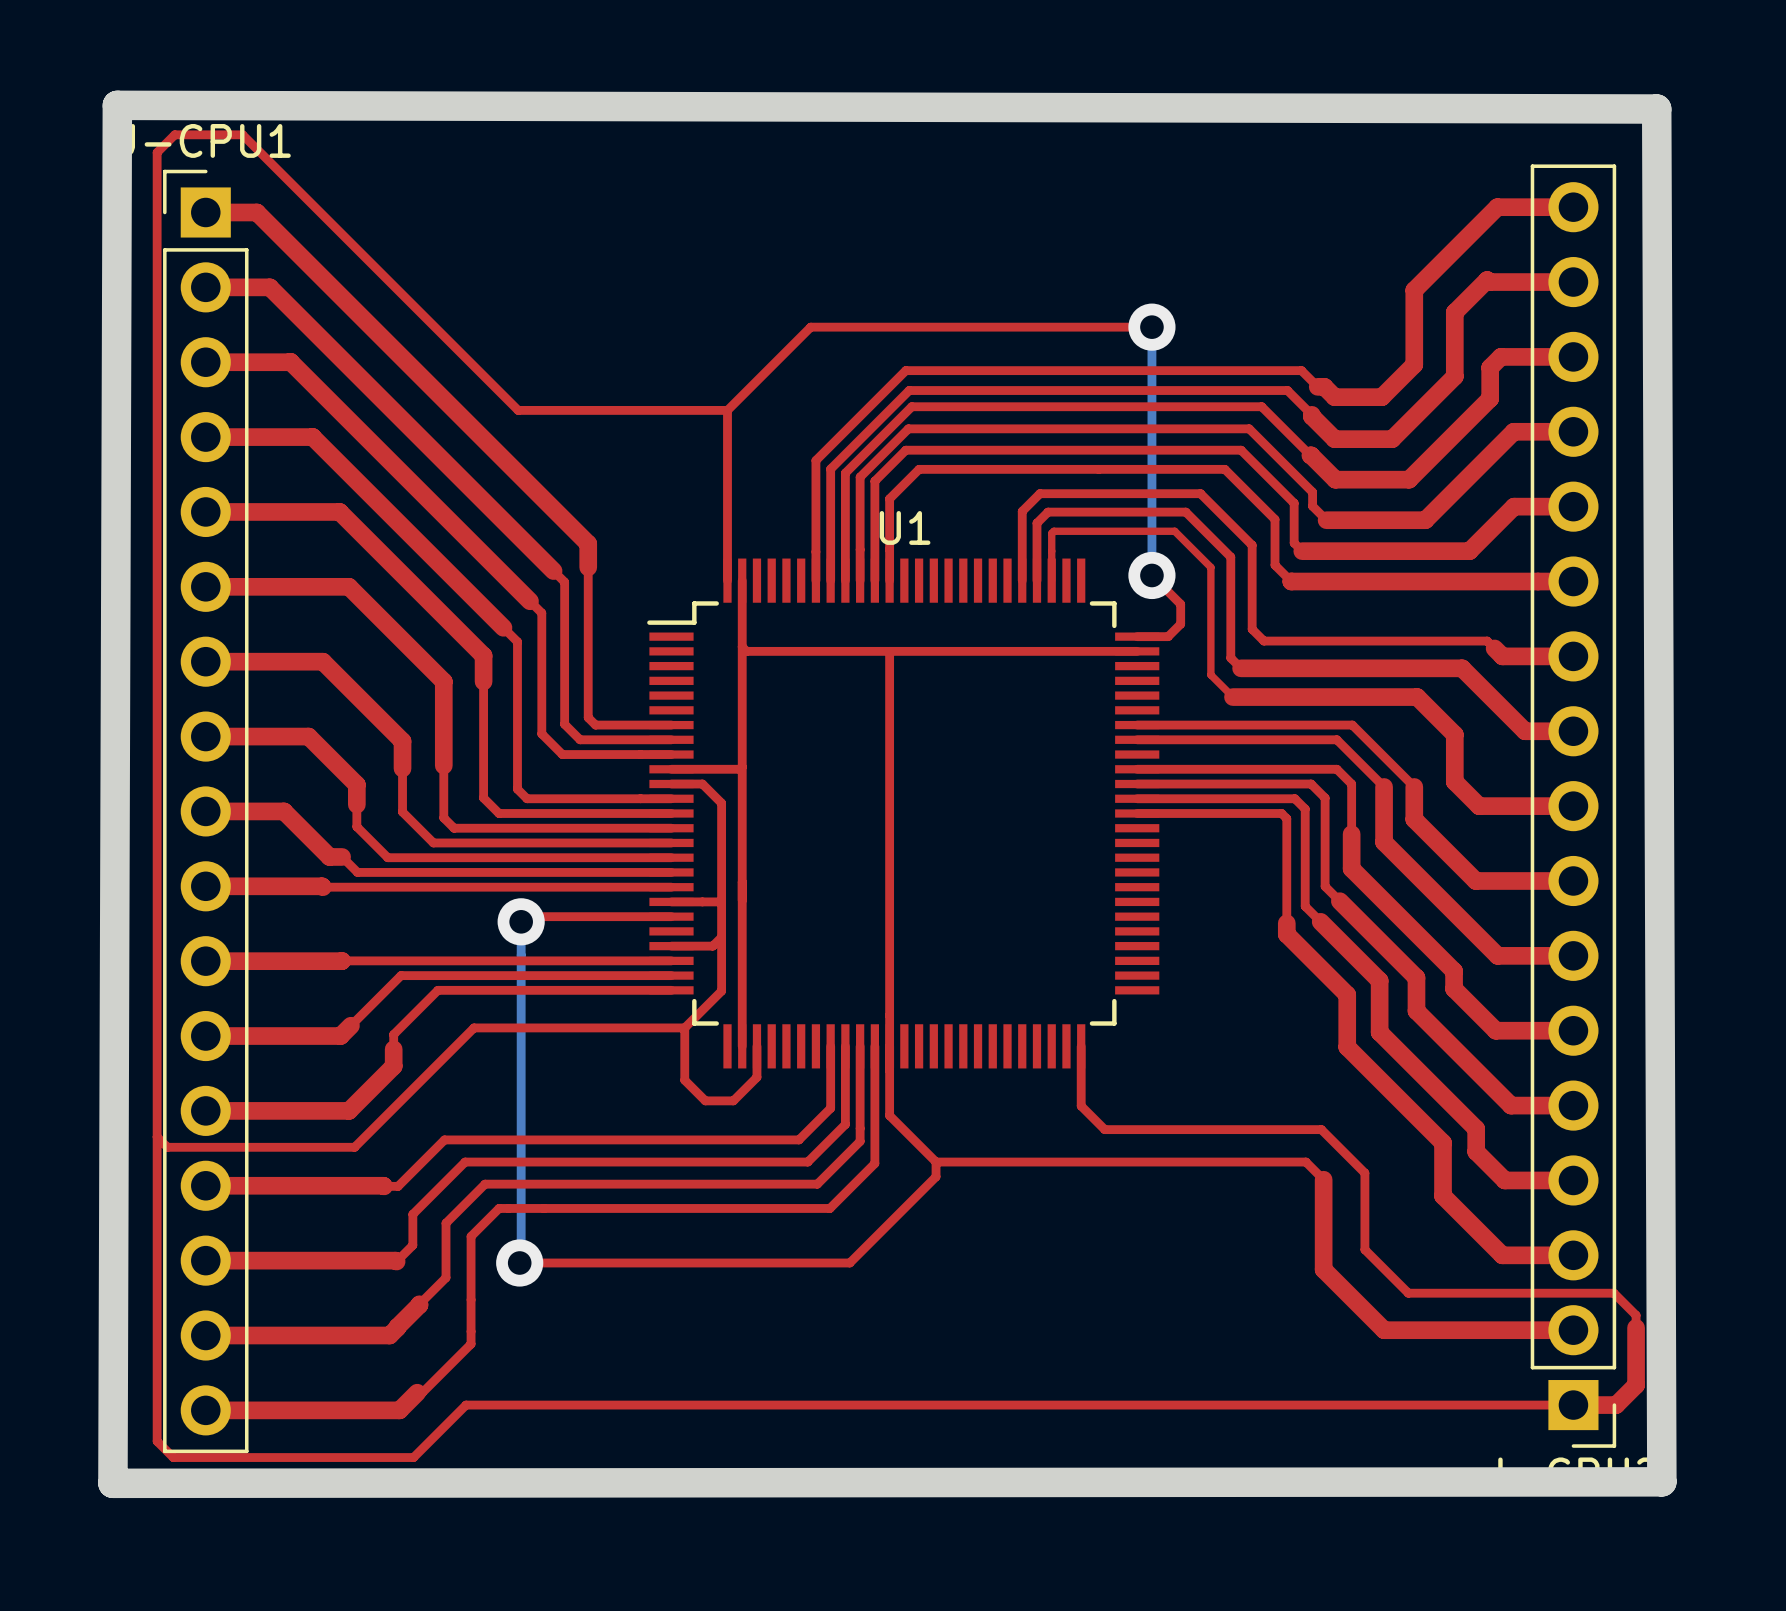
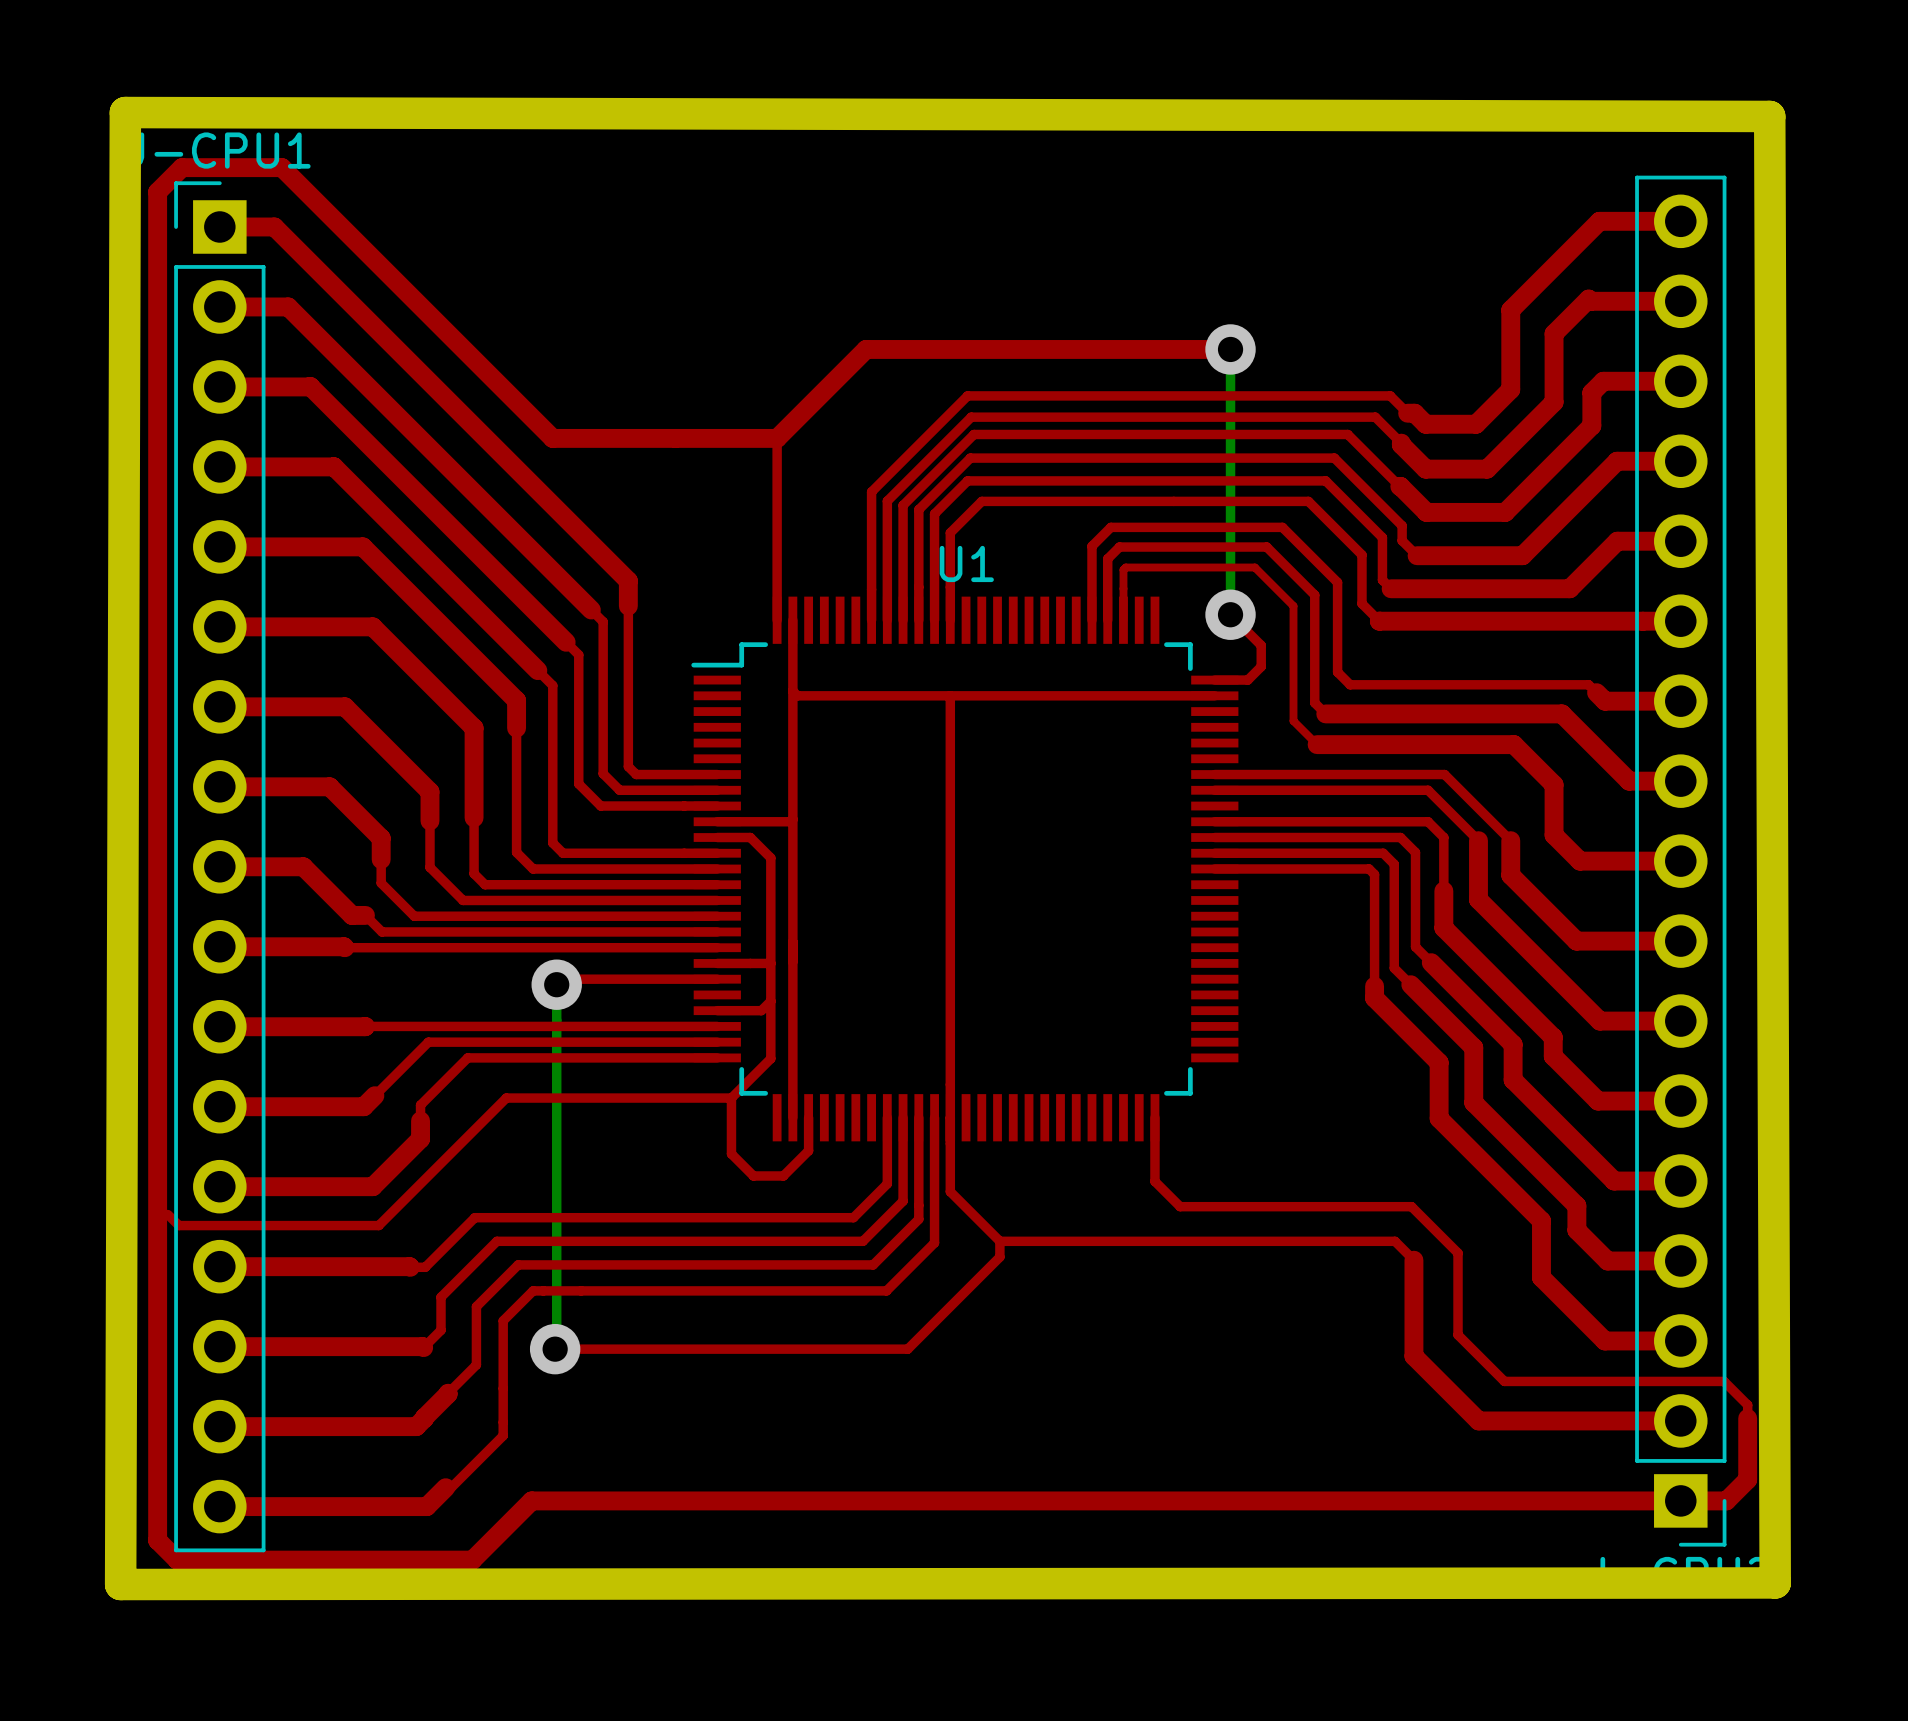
top track width: thin (1151, 327) (810, 327) (727, 410) (518, 410) -> thick (1230, 349) (866, 349) (777, 438) (553, 438)
top track: (518, 410) (242, 134) (174, 134) (157, 152) (157, 1441) (173, 1457) (413, 1457) (466, 1405) (497, 1405) -> (553, 438) (282, 167) (182, 167) (157, 192) (157, 1540) (177, 1560) (472, 1560) (531, 1500)
top track width: thin (497, 1405) (1573, 1405) -> thick (531, 1500) (1680, 1500)

